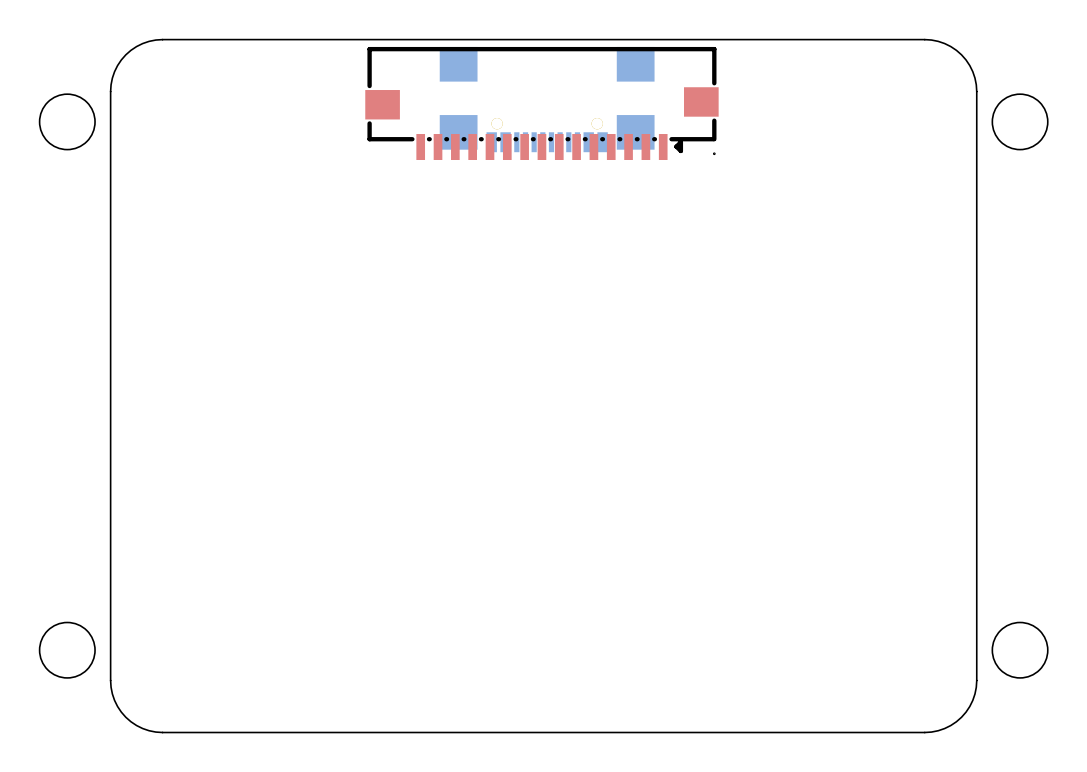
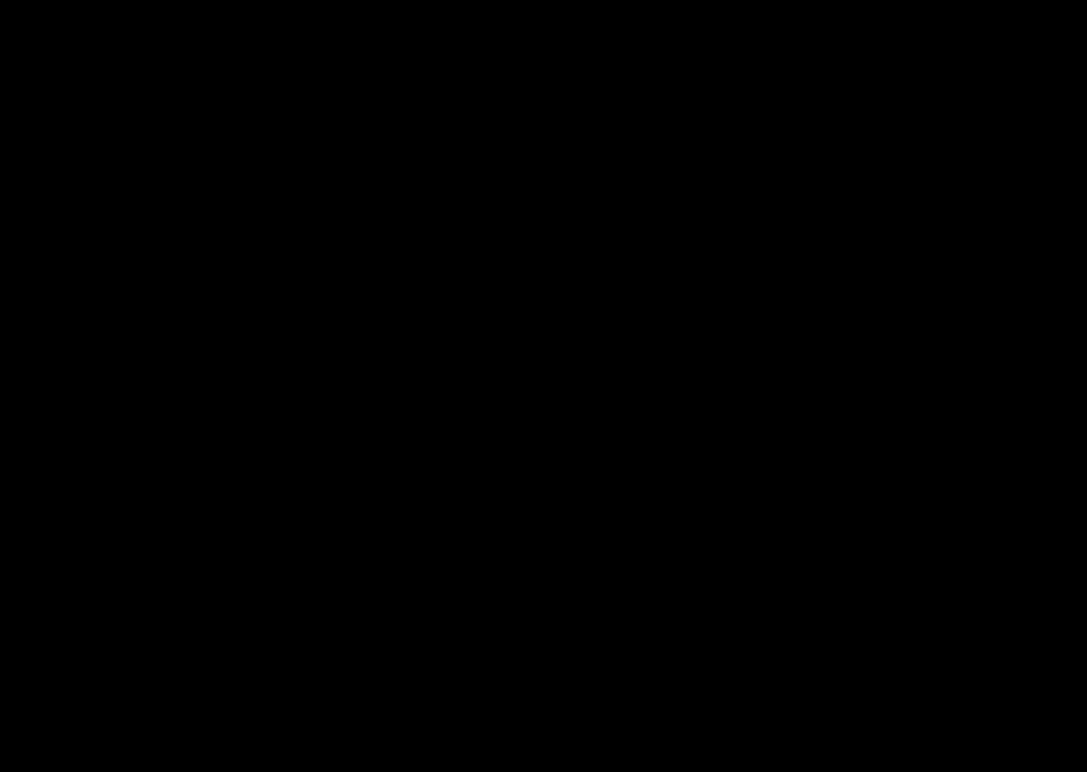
board edge: (162, 39) (924, 39) (938, 41) (956, 50) (966, 59) (972, 71) (976, 91) (976, 680) (972, 700) (966, 712) (956, 721) (944, 728) (924, 732) (162, 732) (149, 730) (130, 721) (121, 712) (114, 700) (110, 680) (110, 91) (114, 71) (125, 54) (142, 43) (162, 39) -> none
round board edge: [39, 93, 96, 151] -> none
round board edge: [991, 93, 1049, 151] -> none
part: (547, 99) -> none
part: (541, 103) -> none
round board edge: [39, 622, 96, 679] -> none
round board edge: [991, 622, 1049, 679] -> none

